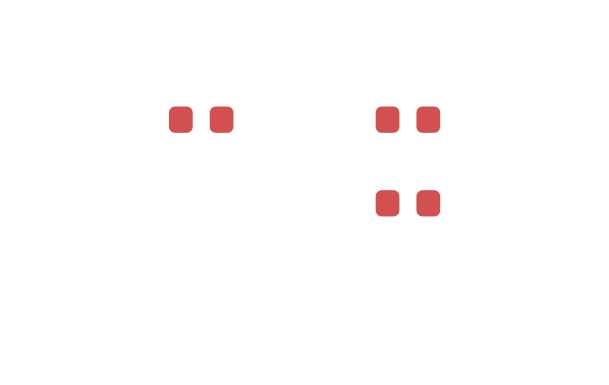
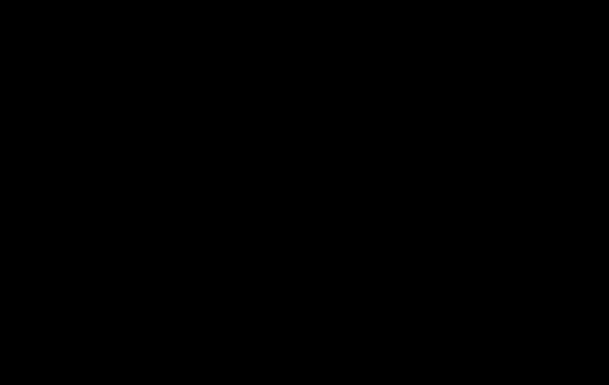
part: (201, 119) -> none
part: (407, 119) -> none
part: (407, 203) -> none

